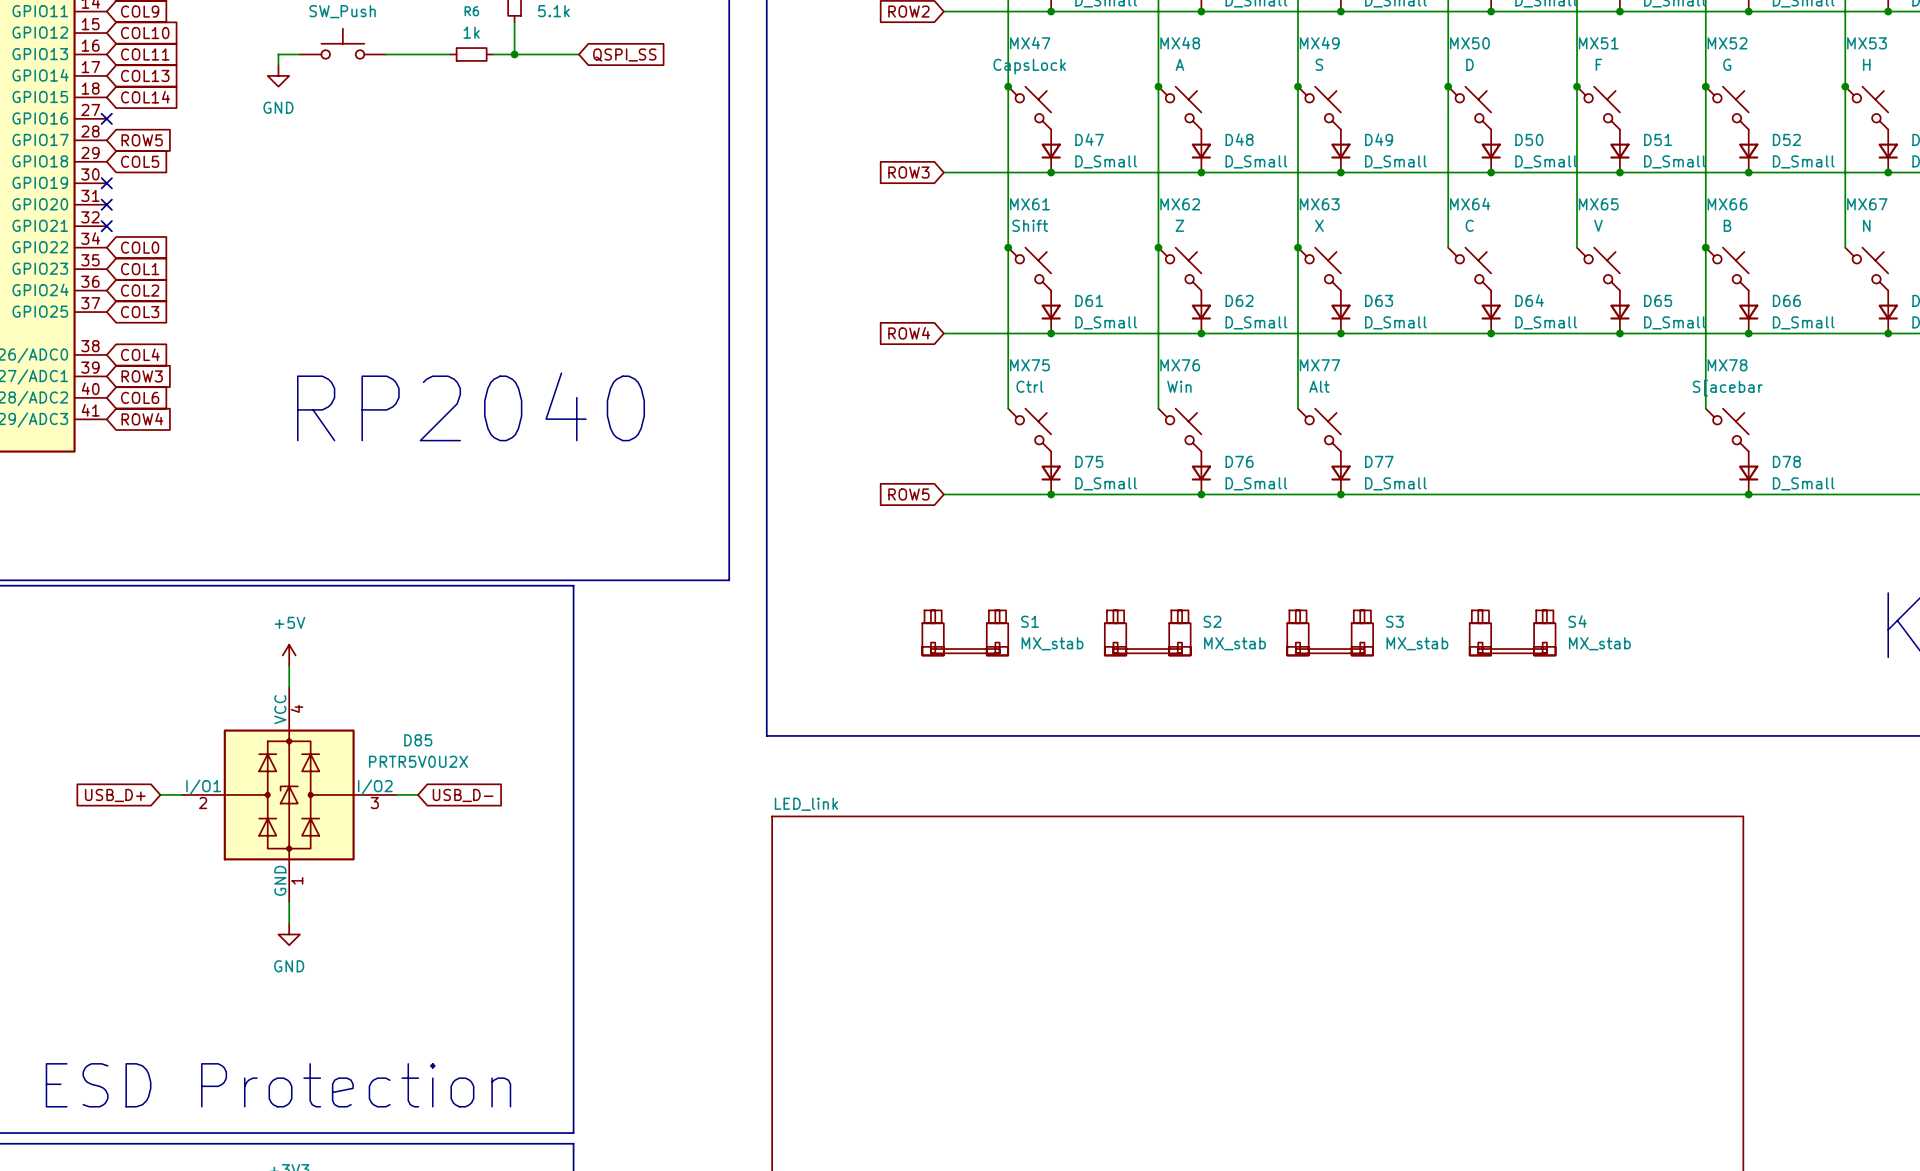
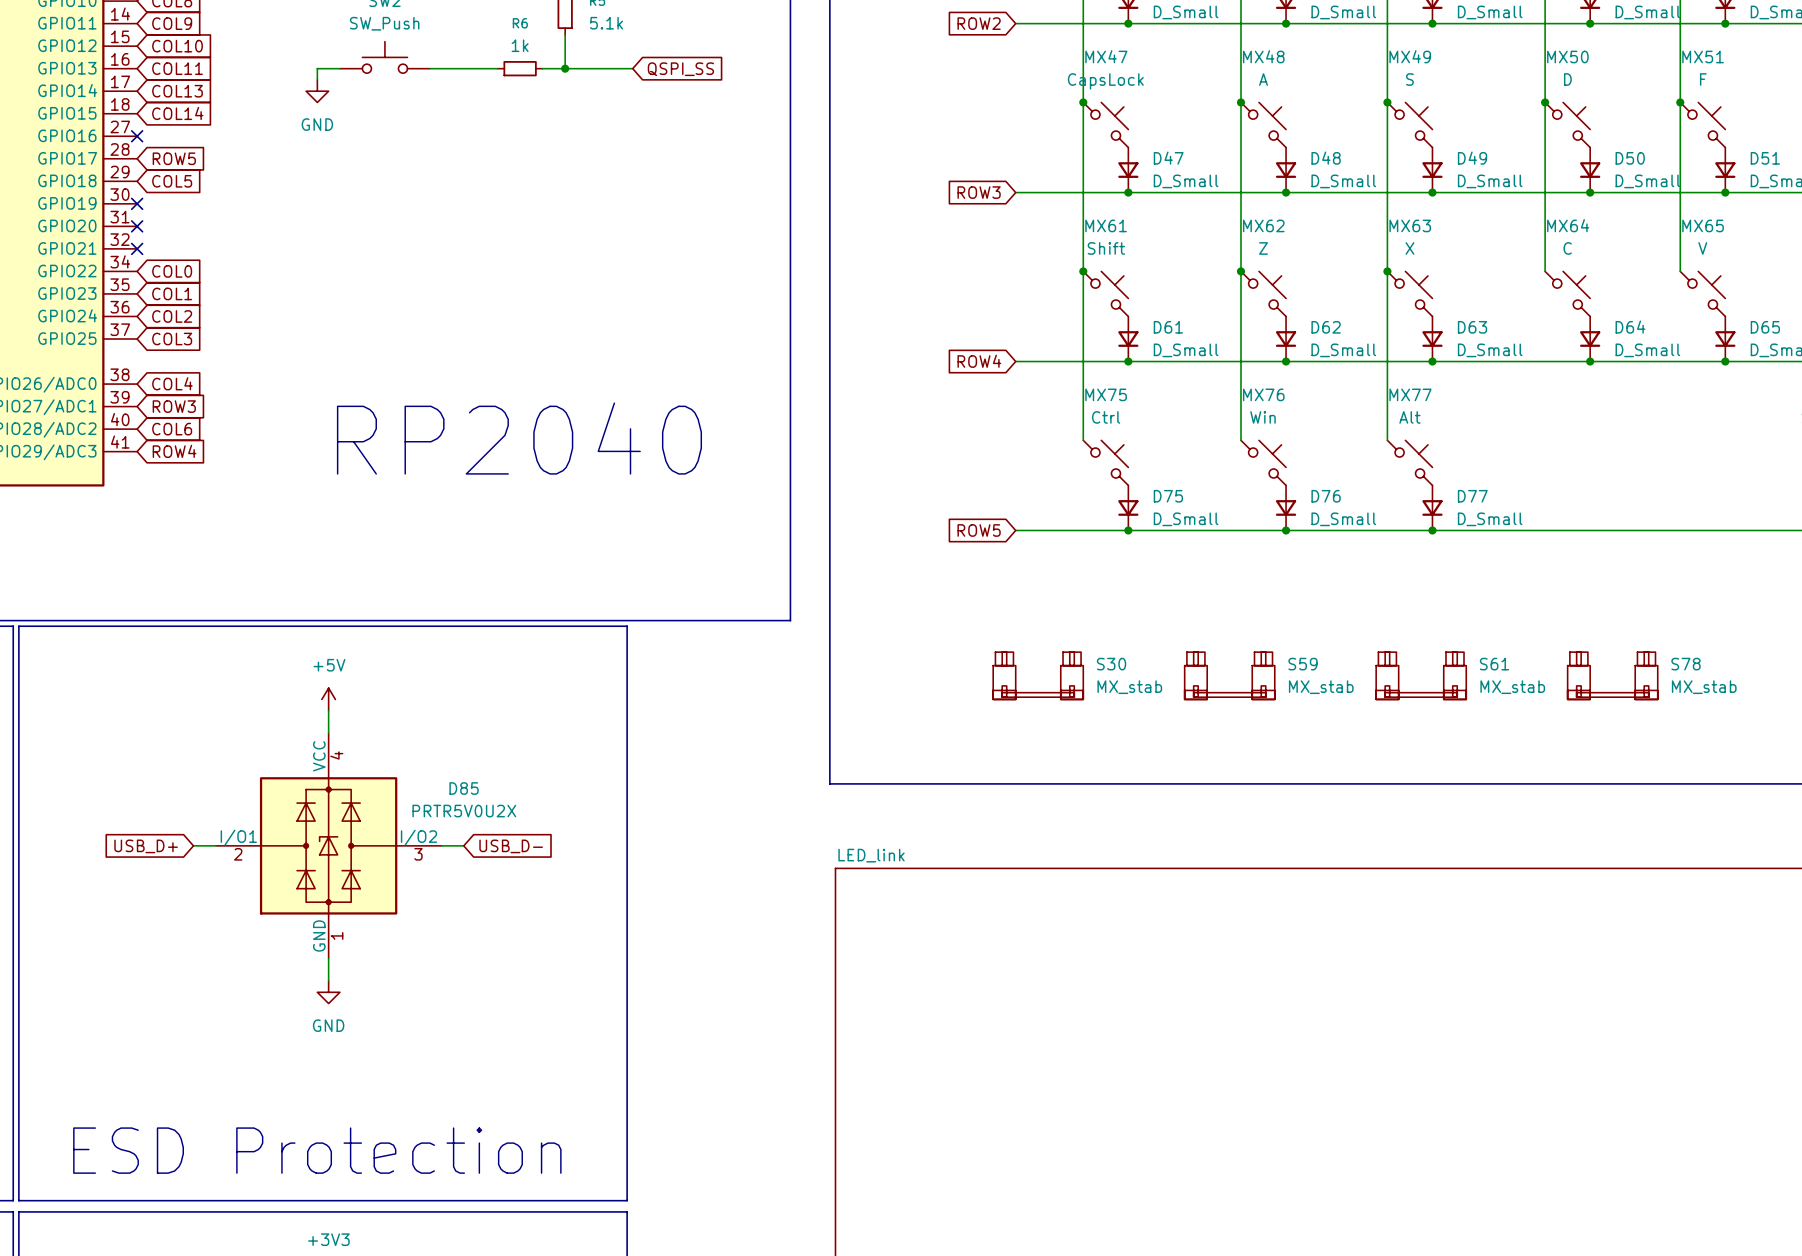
S1 name: S1 (1030, 621) -> S30 (1111, 664)
S2 name: S2 (1212, 621) -> S59 (1303, 664)
S3 name: S3 (1394, 621) -> S61 (1494, 664)
S4 name: S4 (1577, 621) -> S78 (1685, 664)

